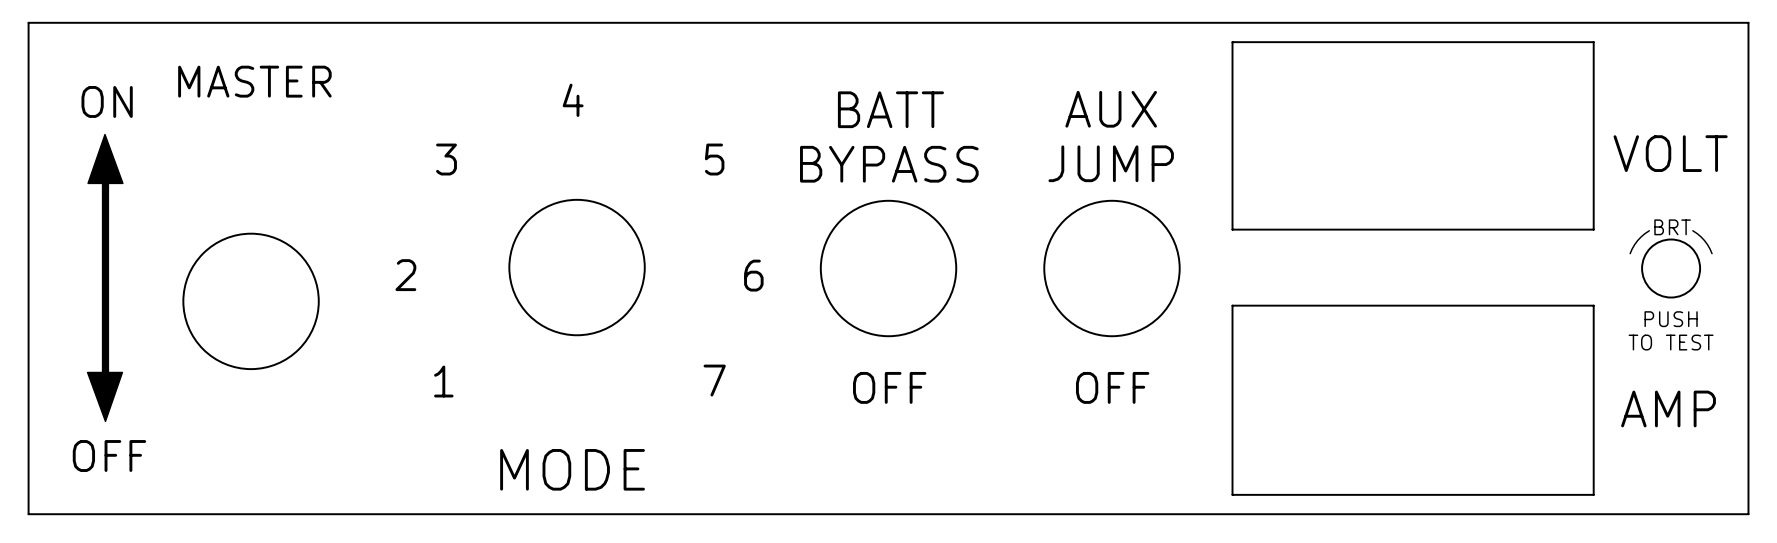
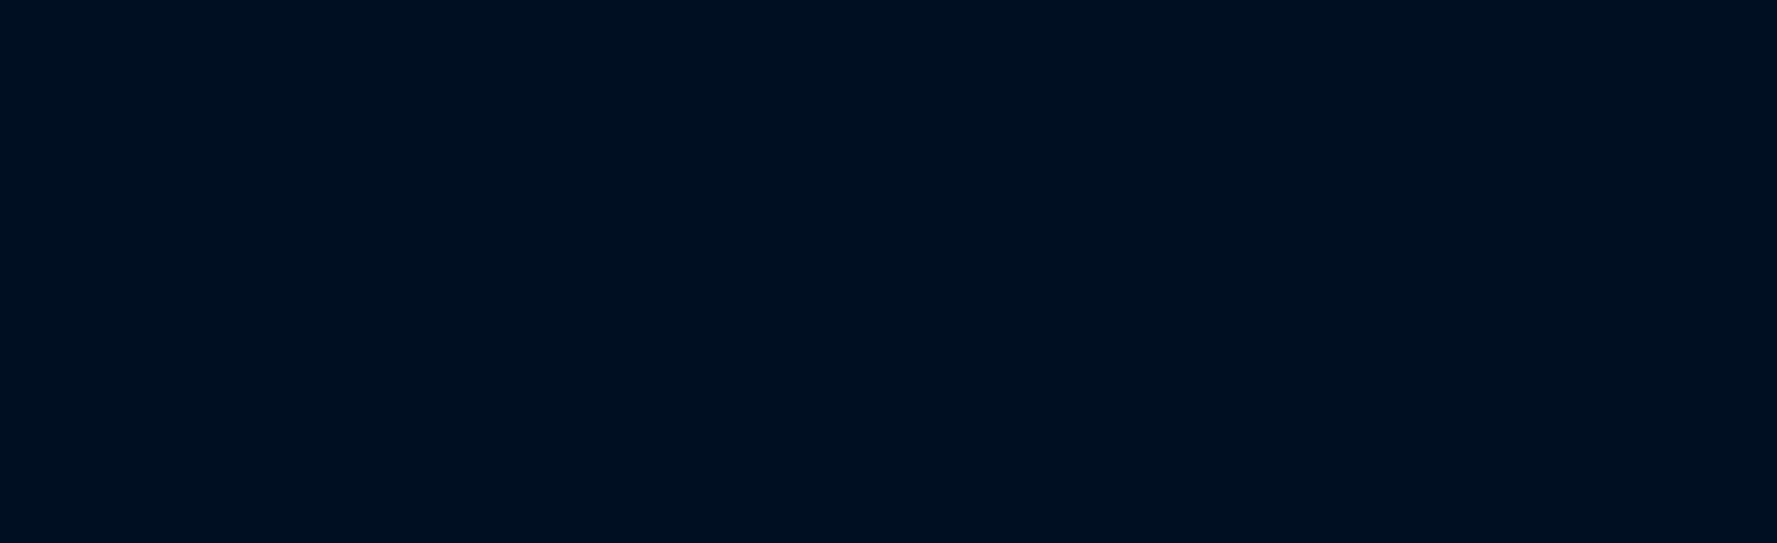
board edge: (28, 22) (1748, 22) (1748, 514) (28, 514) (28, 22) -> none
board edge: (1232, 42) (1232, 229) (1593, 229) (1593, 42) (1232, 42) -> none
text: MASTER (254, 81) -> none
text: 4 (573, 100) -> none
text: ON (107, 101) -> none
text: BATT (890, 109) -> none
text: AUX (1111, 109) -> none
drawing: [87, 133, 124, 185] -> none
text: VOLT (1670, 153) -> none
text: 3 (446, 159) -> none
text: 5 (714, 159) -> none
text: JUMP (1111, 163) -> none
text: BYPASS (889, 164) -> none
line: (105, 176) (105, 377) -> none
round board edge: [508, 198, 646, 337] -> none
round board edge: [819, 199, 958, 338] -> none
round board edge: [1043, 199, 1181, 338] -> none
text: BRT (1672, 227) -> none
line: (1649, 230) (1637, 240) (1630, 253) -> none
line: (1692, 230) (1704, 240) (1712, 253) -> none
round board edge: [182, 232, 320, 371] -> none
round board edge: [1641, 238, 1702, 299] -> none
text: 2 (405, 275) -> none
text: 6 (753, 275) -> none
board edge: (1232, 305) (1593, 305) (1593, 494) (1232, 494) (1232, 305) -> none
text: PUSH (1671, 319) -> none
text: TO TEST (1671, 342) -> none
drawing: [86, 371, 124, 423] -> none
text: 7 (714, 380) -> none
text: 1 (443, 381) -> none
text: OFF (889, 387) -> none
text: OFF (1112, 387) -> none
text: AMP (1668, 408) -> none
text: OFF (109, 456) -> none
text: MODE (572, 469) -> none

